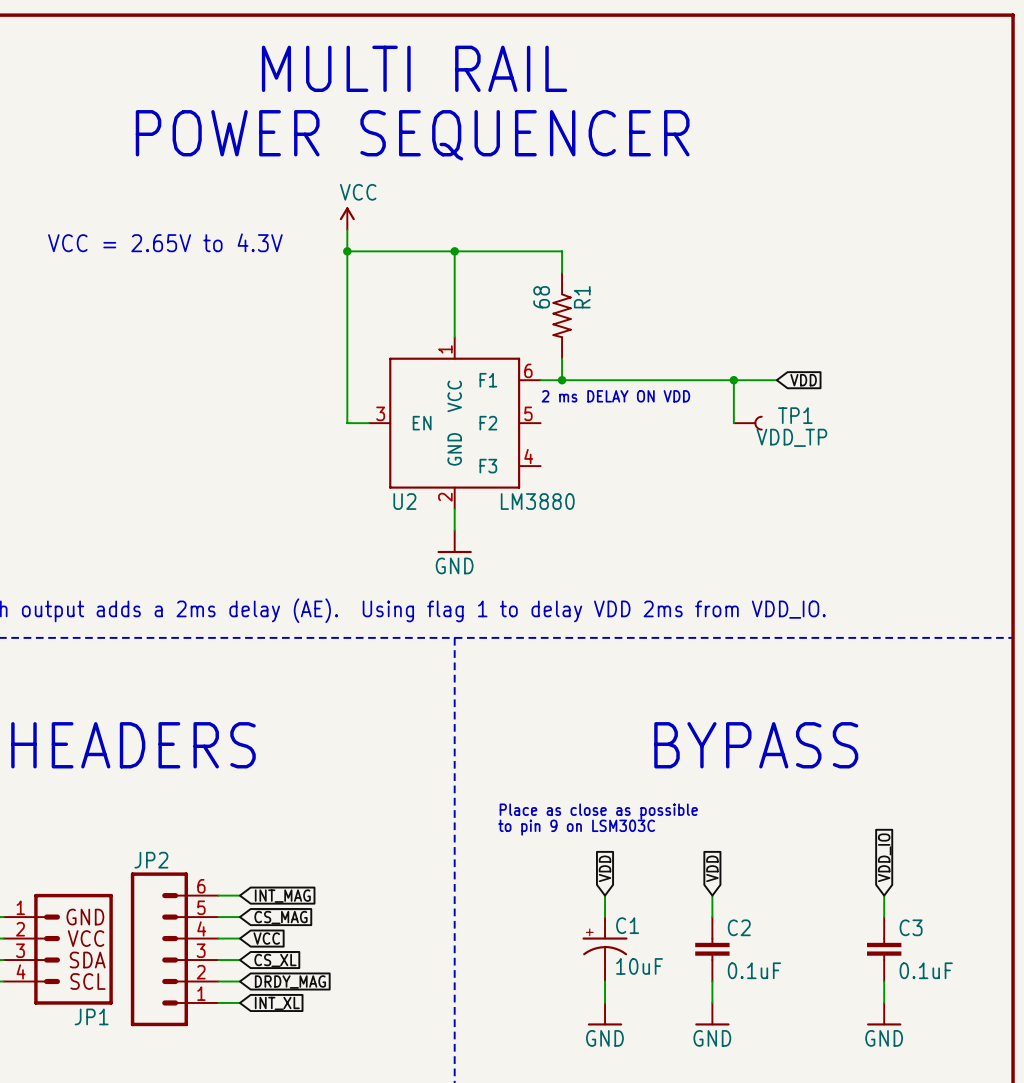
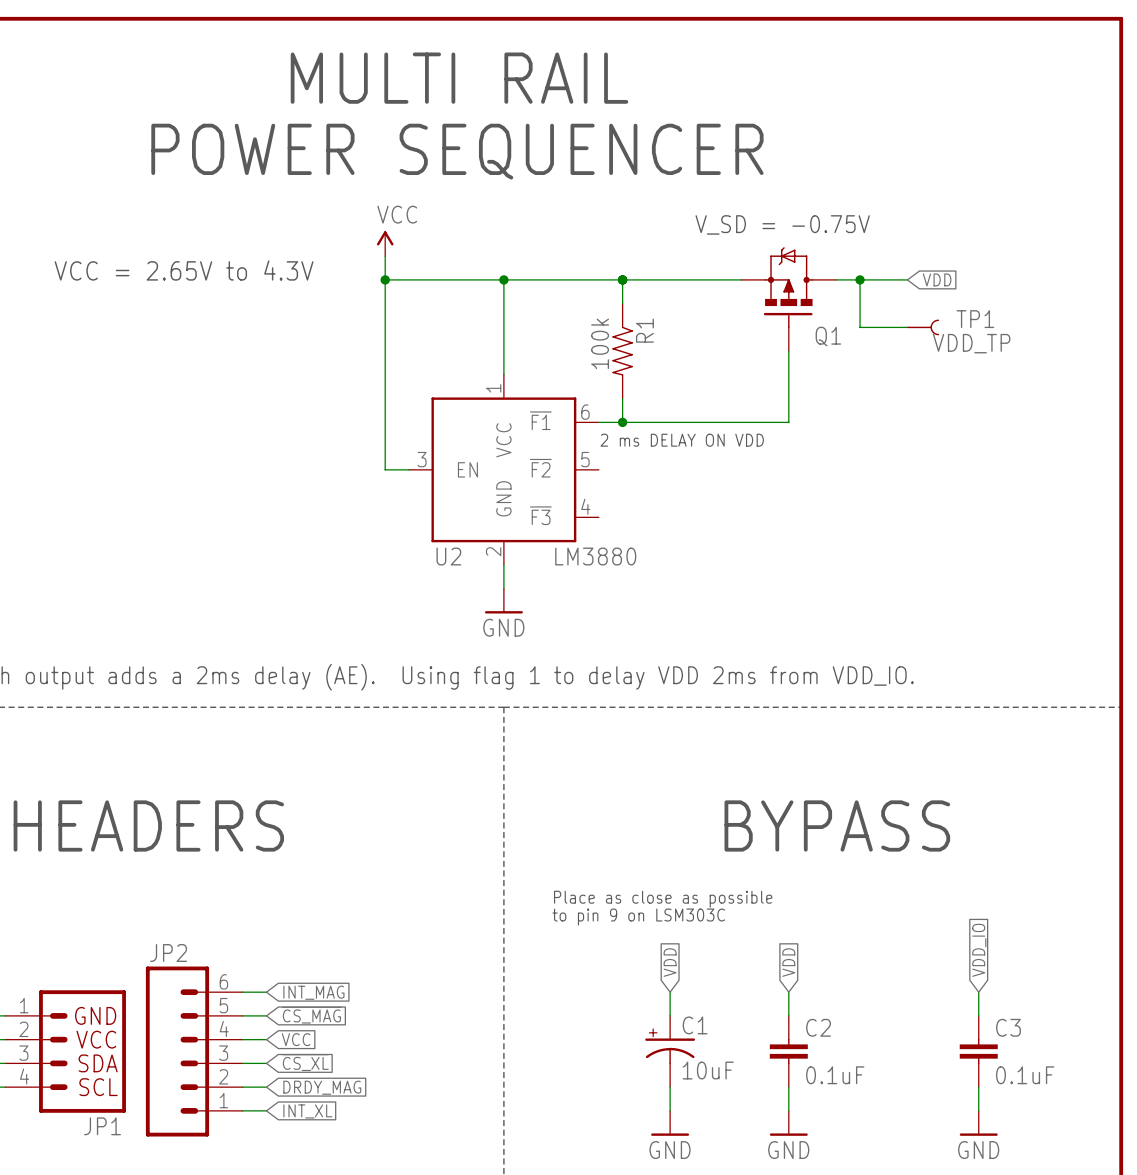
text: none -> V_SD = -0.75V (782, 224)
wire: none -> (622, 279) (741, 279)
junction: none -> (622, 279)
wire: none -> (836, 279) (907, 279)
wire: none -> (860, 279) (860, 327) (907, 327)
junction: none -> (860, 279)
Q1: none -> (788, 299)
R1 value: 68 (541, 297) -> 100k (600, 343)
U2 pin name: F1 (488, 380) -> ~{F1} (540, 420)
wire: (712, 380) (776, 380) -> (788, 422) (788, 351)
wire: (733, 380) (733, 423) -> none
junction: (733, 380) -> none
global label position: VDD (803, 380) -> VDD (937, 279)
U2 pin name: F2 (488, 423) -> ~{F2} (540, 468)
TP1 position: (747, 423) -> (922, 327)
U2 pin name: F3 (488, 466) -> ~{F3} (540, 515)

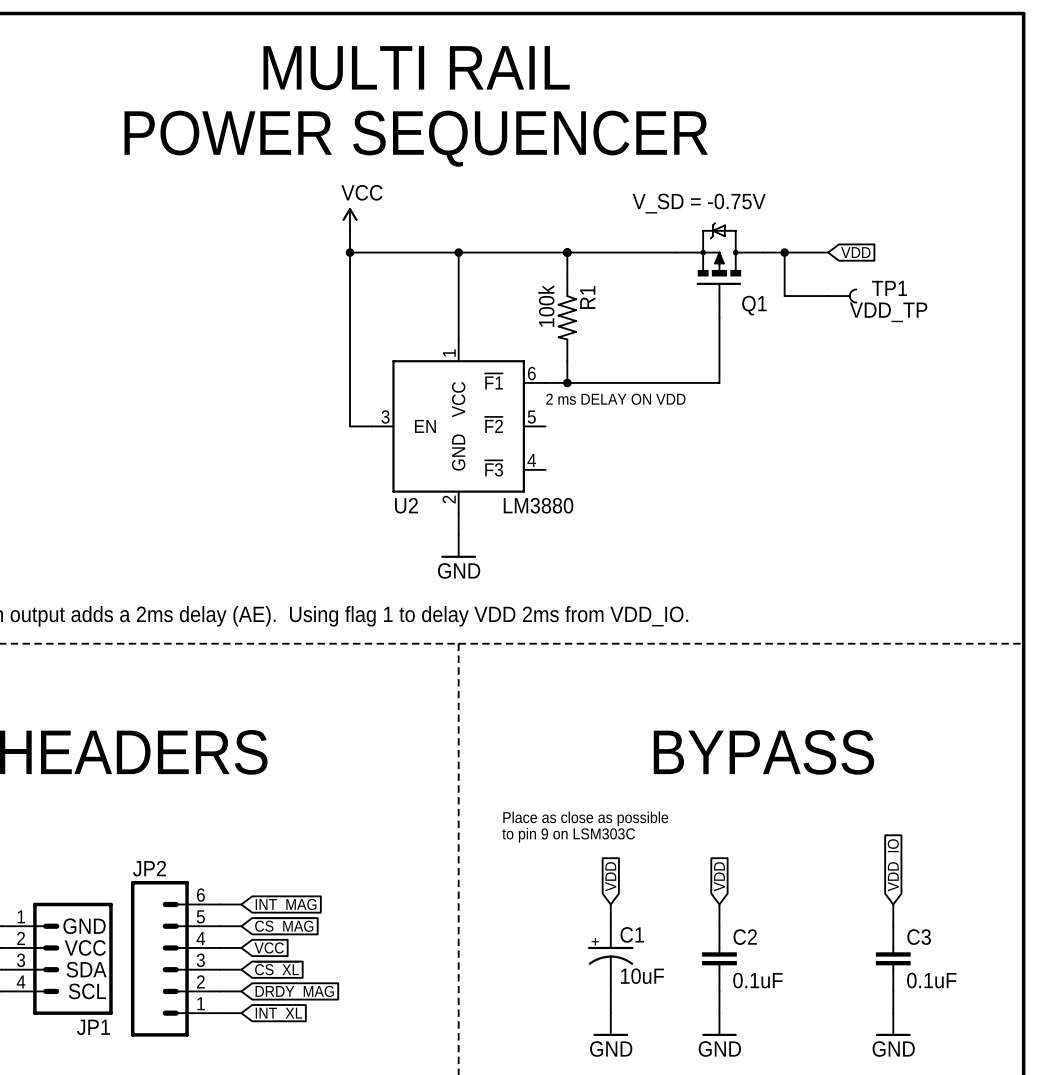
text: VCC = 2.65V to 4.3V (184, 270) -> none

